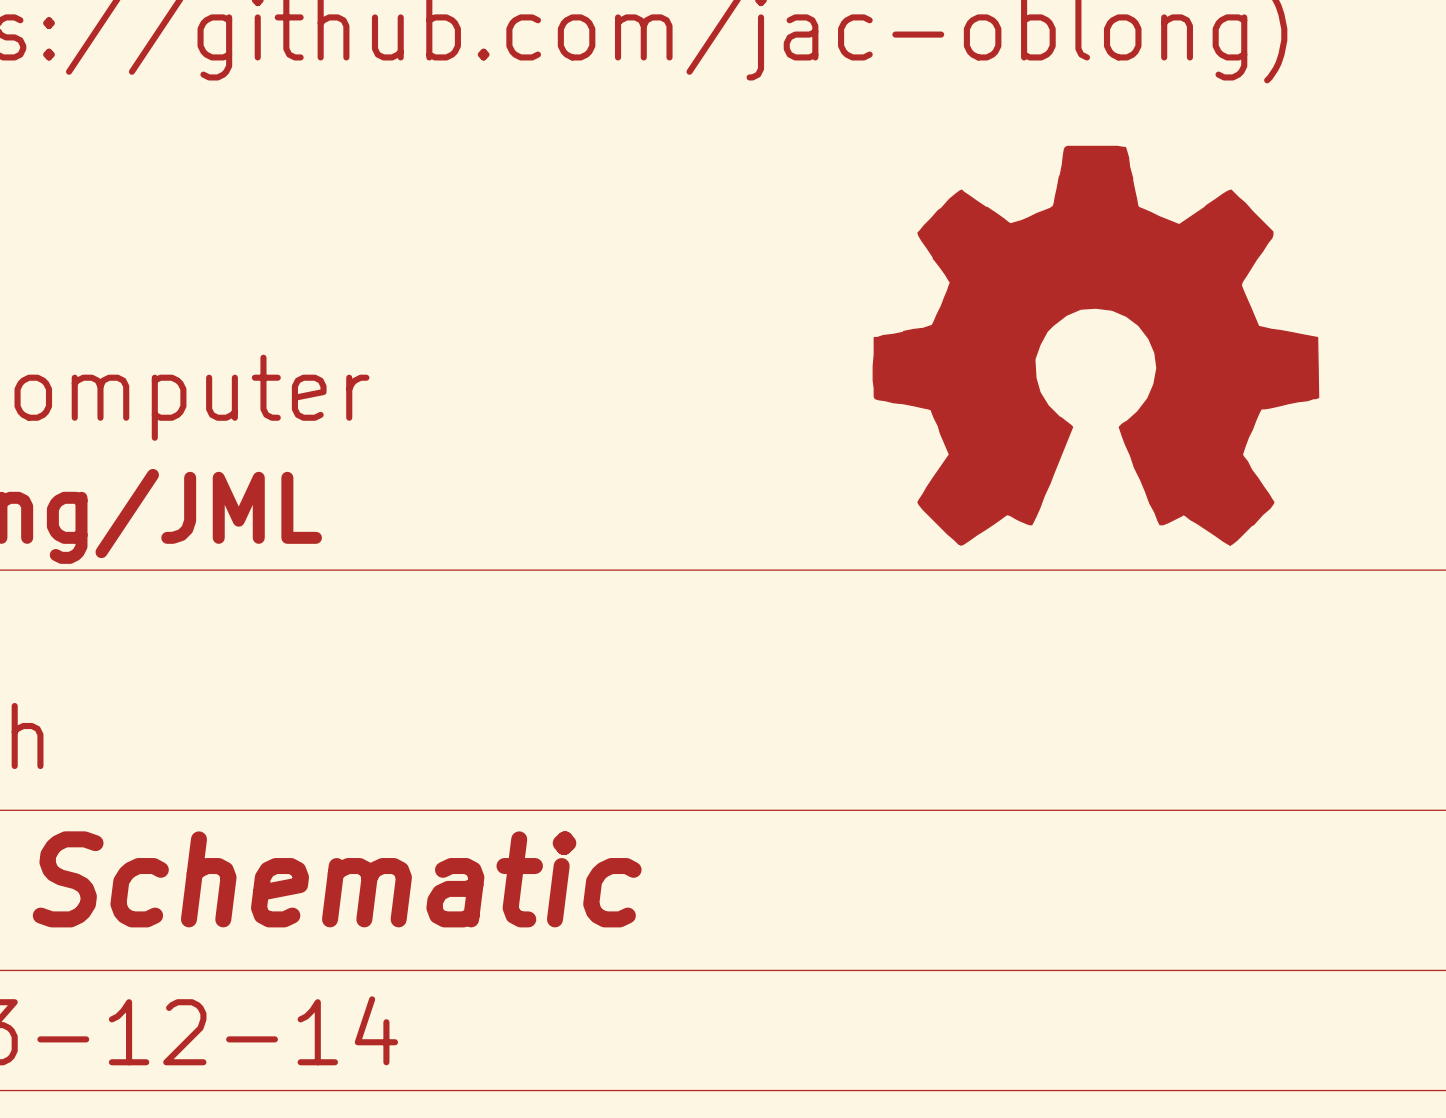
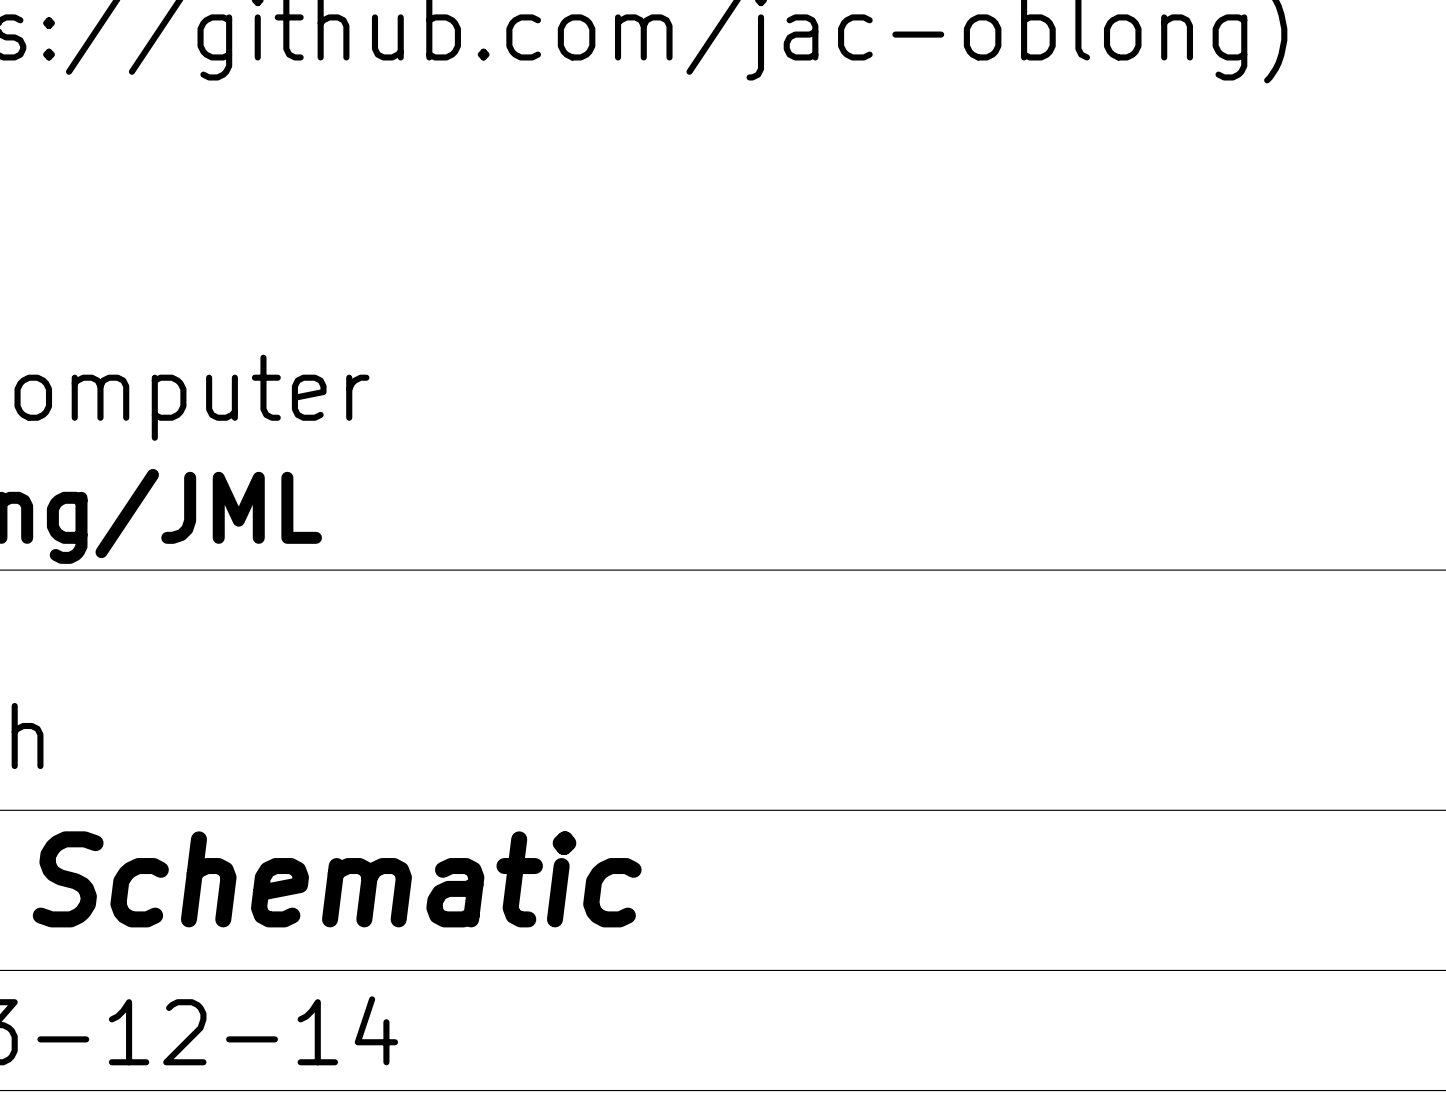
power symbol: (1095, 345) -> none

